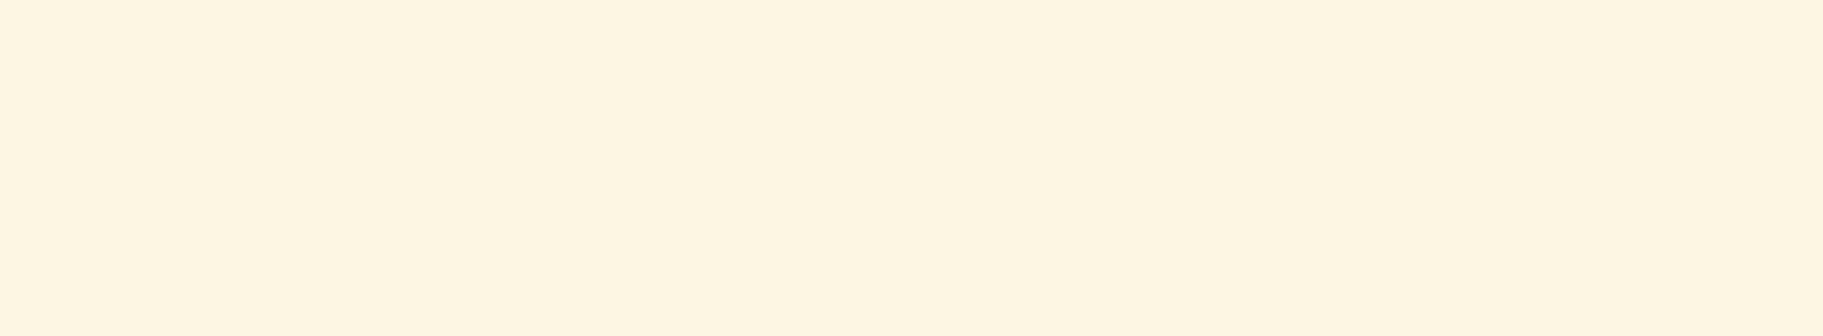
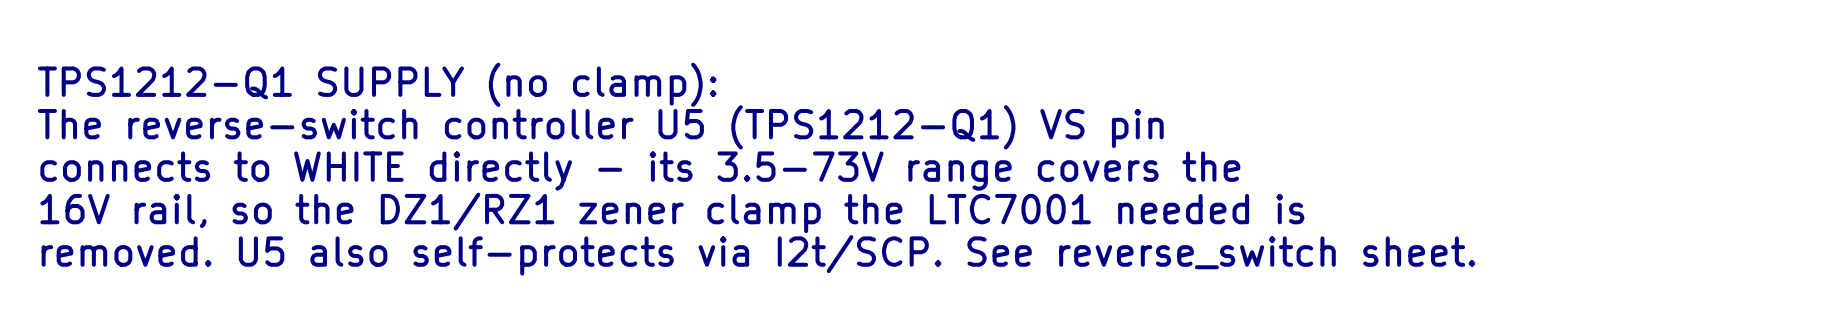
text: none -> TPS1212-Q1 SUPPLY (no clamp): (377, 84)
text: none -> The reverse-switch controller U5 (TPS1212-Q1) VS pin (600, 127)
text: none -> connects to WHITE directly - its 3.5-73V range covers the (640, 171)
text: none -> 16V rail, so the DZ1/RZ1 zener clamp the LTC7001 needed is (672, 212)
text: none -> removed. U5 also self-protects via I2t/SCP. See reverse_switch sheet. (758, 255)

